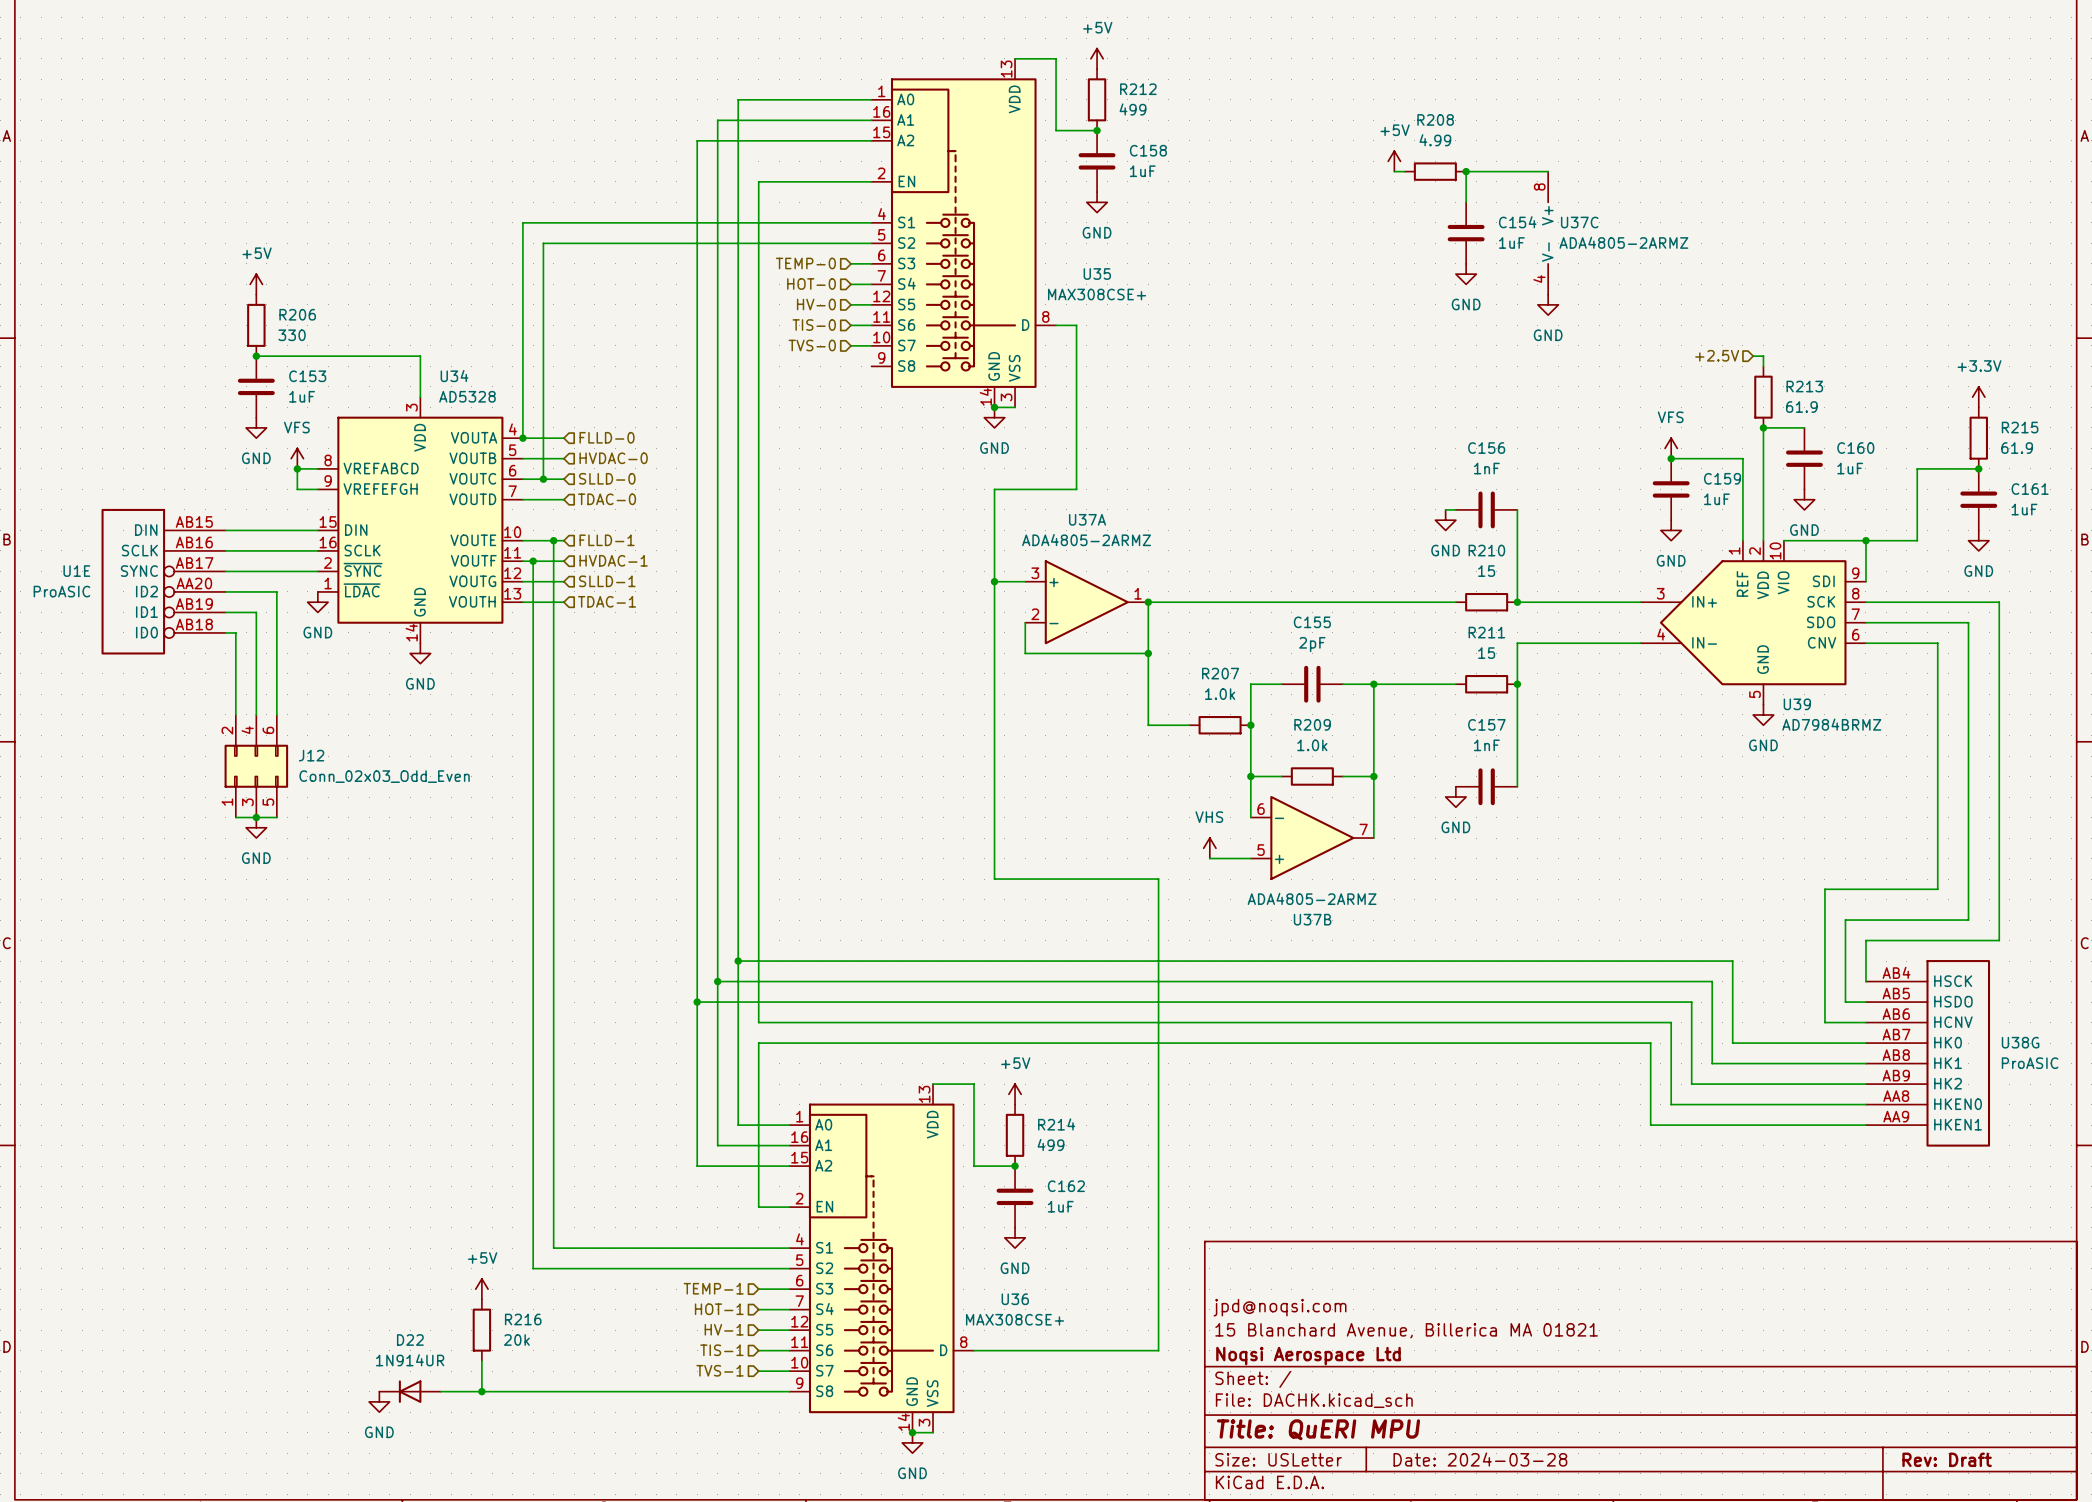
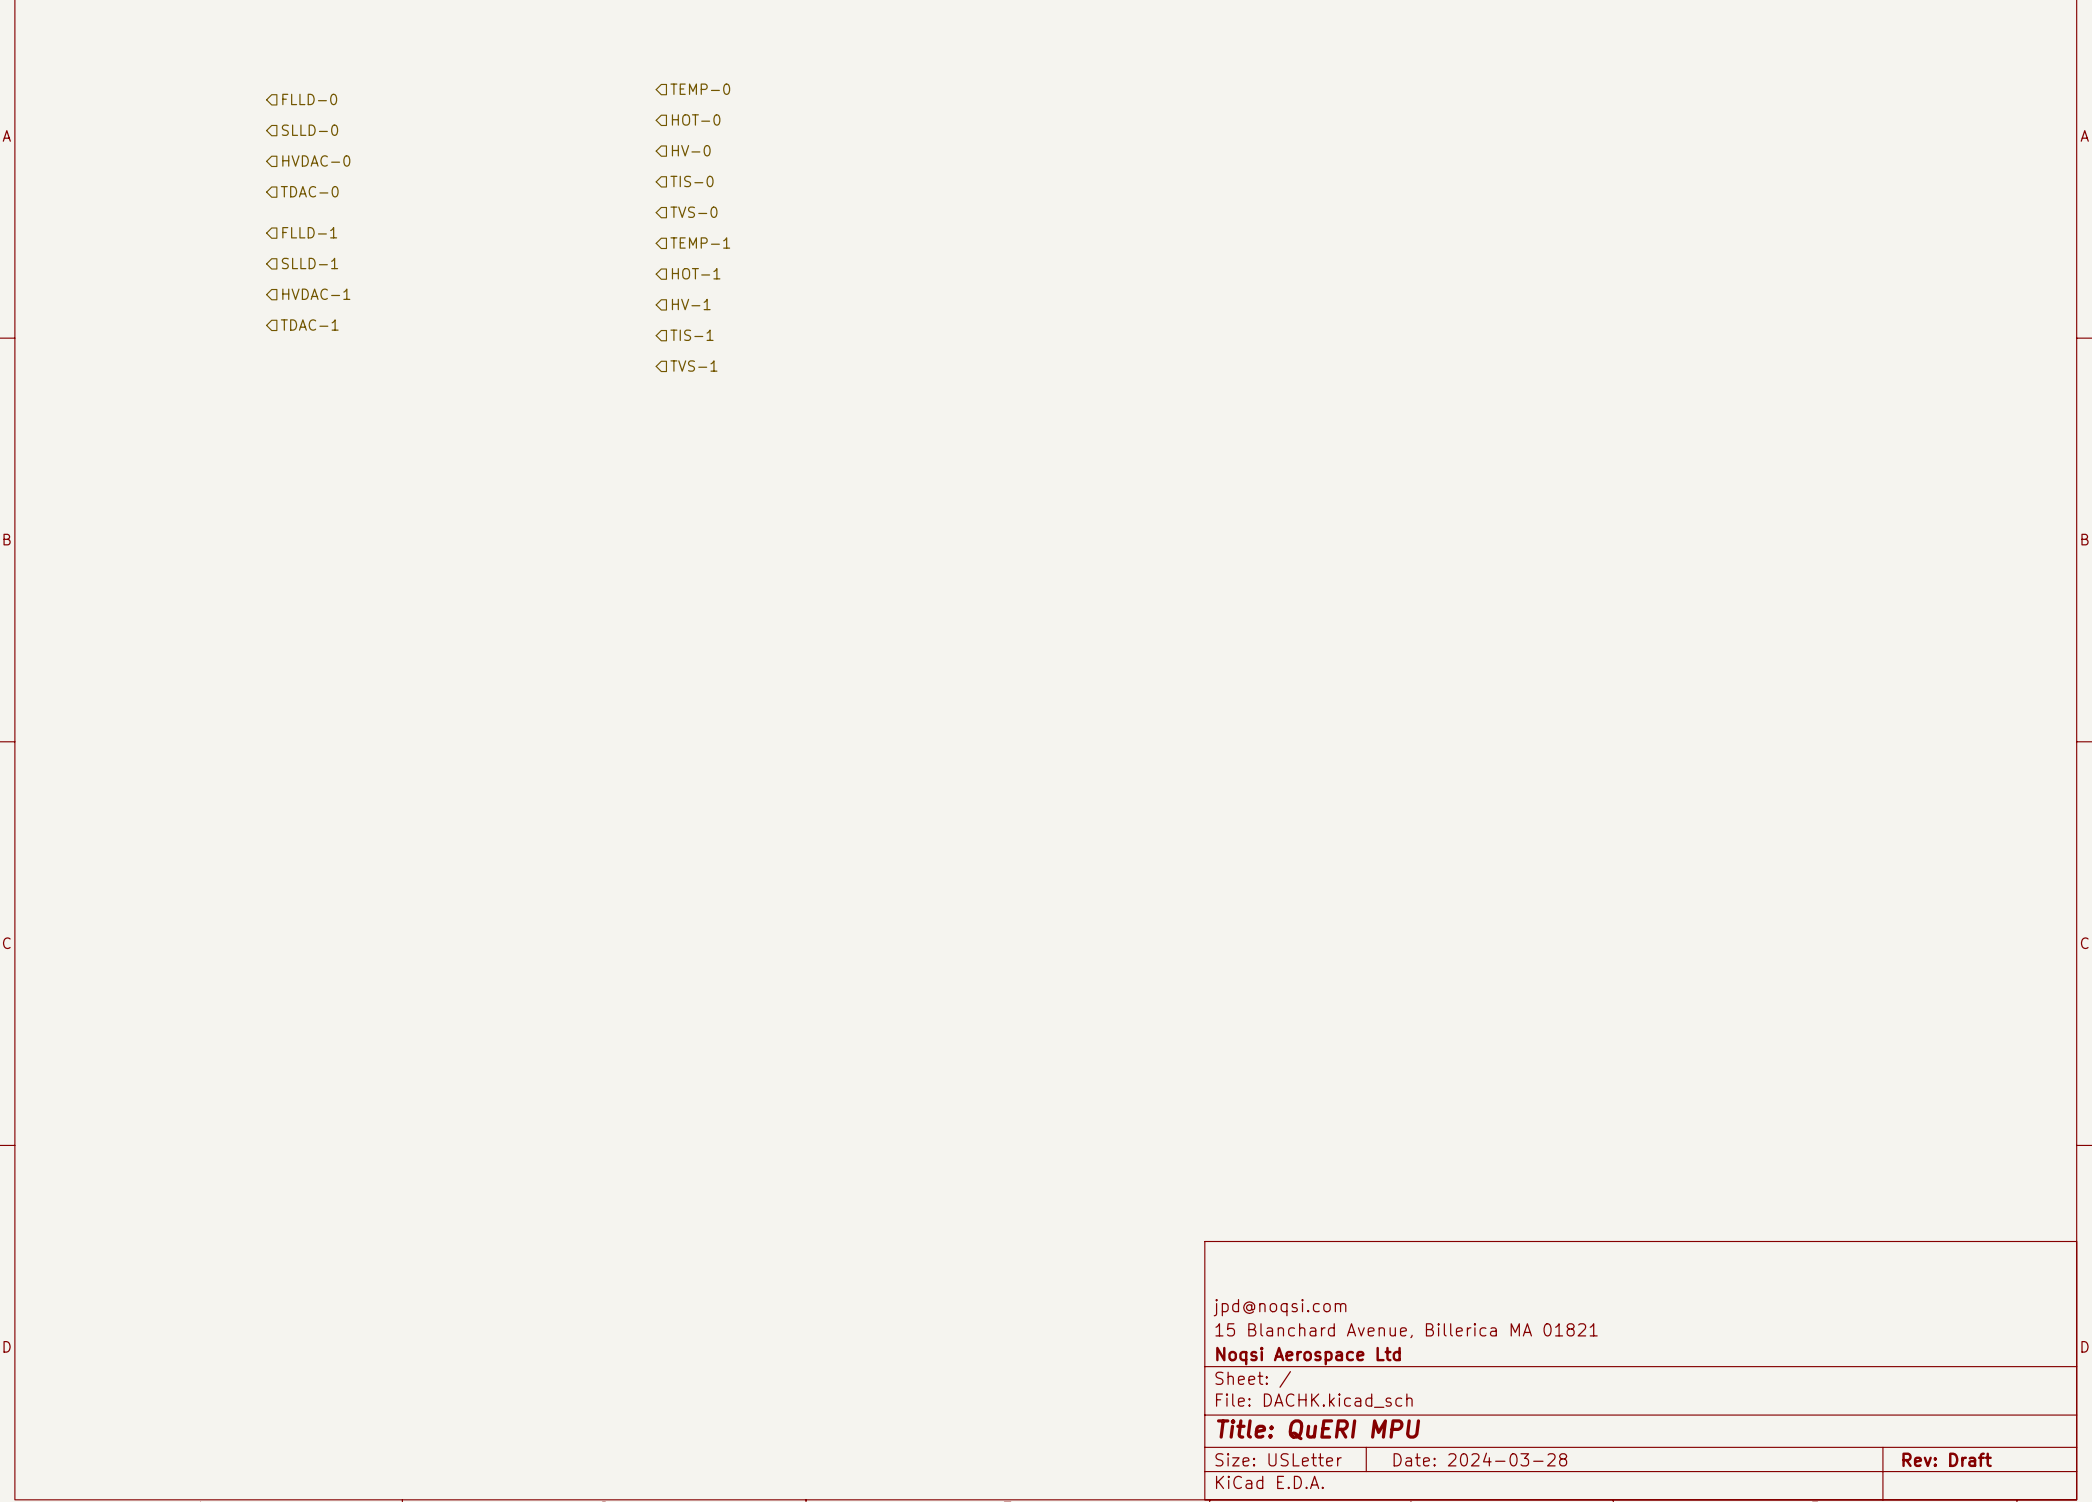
wire: (1015, 58) (1056, 58) (1056, 130) (1097, 130) -> none
power symbol: +5V (1097, 58) -> none
hierarchical label: none -> TEMP-0 (700, 89)
hierarchical label: none -> FLLD-0 (309, 99)
wire: (871, 99) (738, 99) (738, 1125) (789, 1125) -> none
R212: 499 (1097, 99) -> none
hierarchical label: none -> HOT-0 (696, 119)
wire: (871, 120) (717, 120) (717, 1145) (789, 1145) -> none
hierarchical label: none -> SLLD-0 (309, 130)
junction: (1097, 130) -> none
wire: (871, 140) (697, 140) (697, 1166) (789, 1166) -> none
hierarchical label: none -> HV-0 (691, 150)
hierarchical label: none -> HVDAC-0 (316, 160)
C158: 1uF (1097, 161) -> none
power symbol: +5V (1394, 161) -> none
wire: (1394, 171) (1404, 171) -> none
R208: 4.99 (1435, 171) -> none
junction: (1466, 171) -> none
wire: (1548, 171) (1466, 171) (1466, 202) -> none
hierarchical label: none -> TIS-0 (691, 181)
wire: (871, 181) (758, 181) (758, 1022) (1671, 1022) (1671, 1104) (1865, 1104) -> none
hierarchical label: none -> TDAC-0 (309, 191)
power symbol: GND (1097, 202) -> none
hierarchical label: none -> TVS-0 (693, 212)
wire: (871, 222) (522, 222) (522, 438) (563, 438) -> none
hierarchical label: none -> FLLD-1 (309, 232)
U35: MAX308CSE+ (963, 233) -> none
C154: 1uF (1466, 233) -> none
U37C: ADA4805-2ARMZ (1548, 233) -> none
hierarchical label: none -> TEMP-1 (700, 242)
wire: (871, 243) (543, 243) (543, 479) -> none
hierarchical label: none -> SLLD-1 (309, 263)
hierarchical label: TEMP-0 (805, 263) -> none
wire: (850, 263) (871, 263) -> none
hierarchical label: none -> HOT-1 (696, 273)
power symbol: GND (1466, 274) -> none
power symbol: +5V (256, 284) -> none
hierarchical label: HOT-0 (811, 284) -> none
wire: (850, 284) (871, 284) -> none
hierarchical label: none -> HVDAC-1 (316, 294)
hierarchical label: none -> HV-1 (691, 304)
hierarchical label: HV-0 (816, 304) -> none
wire: (850, 304) (871, 304) -> none
power symbol: GND (1548, 304) -> none
R206: 330 (256, 325) -> none
hierarchical label: none -> TDAC-1 (309, 325)
hierarchical label: TIS-0 (814, 325) -> none
wire: (850, 325) (871, 325) -> none
wire: (1056, 325) (1076, 325) (1076, 489) (994, 489) (994, 879) (1158, 879) (1158, 1350) (974, 1350) -> none
hierarchical label: none -> TIS-1 (691, 335)
hierarchical label: TVS-0 (812, 345) -> none
wire: (850, 345) (871, 345) -> none
hierarchical label: +2.5V (1717, 355) -> none
wire: (256, 356) (420, 356) (420, 397) -> none
junction: (256, 356) -> none
wire: (1753, 356) (1763, 356) (1763, 366) -> none
hierarchical label: none -> TVS-1 (693, 366)
C153: 1uF (256, 386) -> none
R213: 61.9 (1763, 397) -> none
power symbol: +3.3V (1978, 397) -> none
wire: (994, 407) (1015, 407) -> none
junction: (994, 407) -> none
power symbol: GND (994, 417) -> none
power symbol: GND (256, 427) -> none
junction: (1763, 427) -> none
wire: (1804, 427) (1763, 427) (1763, 540) -> none
hierarchical label: FLLD-0 (607, 437) -> none
junction: (522, 438) -> none
R215: 61.9 (1978, 438) -> none
power symbol: VFS (1671, 448) -> none
power symbol: VFS (297, 458) -> none
wire: (522, 458) (563, 458) -> none
hierarchical label: HVDAC-0 (613, 458) -> none
wire: (1671, 458) (1742, 458) (1742, 540) -> none
junction: (1671, 458) -> none
C160: 1uF (1804, 458) -> none
junction: (297, 468) -> none
wire: (317, 468) (297, 468) (297, 489) (317, 489) -> none
wire: (1978, 468) (1917, 468) (1917, 540) (1783, 540) -> none
junction: (1978, 468) -> none
hierarchical label: SLLD-0 (607, 478) -> none
wire: (522, 479) (563, 479) -> none
junction: (543, 479) -> none
C159: 1uF (1671, 489) -> none
wire: (522, 499) (563, 499) -> none
hierarchical label: TDAC-0 (607, 499) -> none
power symbol: GND (1804, 499) -> none
C161: 1uF (1978, 499) -> none
wire: (1445, 509) (1455, 509) -> none
C156: 1nF (1486, 509) -> none
wire: (1517, 509) (1517, 602) (1640, 602) -> none
U34: AD5328 (420, 520) -> none
power symbol: GND (1445, 520) -> none
wire: (225, 530) (317, 530) -> none
power symbol: GND (1671, 530) -> none
wire: (522, 540) (563, 540) -> none
wire: (553, 540) (553, 1248) (789, 1248) -> none
junction: (553, 540) -> none
hierarchical label: FLLD-1 (607, 540) -> none
wire: (1865, 540) (1865, 581) -> none
junction: (1865, 540) -> none
power symbol: GND (1978, 540) -> none
wire: (225, 550) (317, 550) -> none
hierarchical label: HVDAC-1 (613, 560) -> none
wire: (522, 561) (563, 561) -> none
wire: (533, 561) (533, 1268) (789, 1268) -> none
junction: (533, 561) -> none
wire: (225, 571) (317, 571) -> none
U1E: ProASIC (163, 581) -> none
wire: (522, 581) (563, 581) -> none
hierarchical label: SLLD-1 (607, 581) -> none
wire: (994, 581) (1025, 581) -> none
junction: (994, 581) -> none
wire: (225, 591) (276, 591) (276, 714) -> none
hierarchical label: TDAC-1 (607, 601) -> none
power symbol: GND (317, 602) -> none
wire: (522, 602) (563, 602) -> none
U37A: ADA4805-2ARMZ (1086, 602) -> none
junction: (1148, 602) -> none
wire: (1455, 602) (1148, 602) (1148, 725) (1189, 725) -> none
R210: 15 (1486, 602) -> none
junction: (1517, 602) -> none
wire: (1865, 602) (1999, 602) (1999, 940) (1865, 940) (1865, 981) -> none
wire: (225, 612) (256, 612) (256, 714) -> none
wire: (1025, 622) (1025, 653) (1148, 653) -> none
U39: AD7984BRMZ (1753, 622) -> none
wire: (1865, 622) (1968, 622) (1968, 920) (1845, 920) (1845, 1002) (1865, 1002) -> none
wire: (225, 632) (235, 632) (235, 714) -> none
wire: (1640, 643) (1517, 643) (1517, 786) -> none
wire: (1865, 643) (1937, 643) (1937, 889) (1824, 889) (1824, 1022) (1865, 1022) -> none
power symbol: GND (420, 653) -> none
junction: (1148, 653) -> none
wire: (1281, 684) (1250, 684) (1250, 817) -> none
C155: 2pF (1312, 684) -> none
wire: (1343, 684) (1455, 684) -> none
wire: (1373, 684) (1373, 838) -> none
junction: (1373, 684) -> none
R211: 15 (1486, 684) -> none
junction: (1517, 684) -> none
power symbol: GND (1763, 714) -> none
R207: 1.0k (1220, 725) -> none
junction: (1250, 725) -> none
J12: Conn_02x03_Odd_Even (256, 766) -> none
wire: (1250, 776) (1281, 776) -> none
junction: (1250, 776) -> none
R209: 1.0k (1312, 776) -> none
wire: (1343, 776) (1373, 776) -> none
junction: (1373, 776) -> none
C157: 1nF (1486, 786) -> none
power symbol: GND (1455, 797) -> none
wire: (235, 817) (276, 817) -> none
junction: (256, 817) -> none
power symbol: GND (256, 827) -> none
U37B: ADA4805-2ARMZ (1312, 838) -> none
power symbol: VHS (1209, 848) -> none
wire: (1209, 858) (1250, 858) -> none
wire: (738, 961) (1732, 961) (1732, 1043) (1865, 1043) -> none
junction: (738, 961) -> none
wire: (717, 981) (1712, 981) (1712, 1063) (1865, 1063) -> none
junction: (717, 981) -> none
wire: (697, 1002) (1691, 1002) (1691, 1084) (1865, 1084) -> none
junction: (697, 1002) -> none
U38G: ProASIC (1928, 1053) -> none
wire: (933, 1084) (974, 1084) (974, 1166) (1015, 1166) -> none
power symbol: +5V (1015, 1094) -> none
wire: (1865, 1125) (1650, 1125) (1650, 1043) (758, 1043) (758, 1207) (789, 1207) -> none
R214: 499 (1015, 1135) -> none
junction: (1015, 1166) -> none
C162: 1uF (1015, 1196) -> none
power symbol: GND (1015, 1237) -> none
U36: MAX308CSE+ (881, 1258) -> none
hierarchical label: TEMP-1 (713, 1288) -> none
power symbol: +5V (481, 1289) -> none
wire: (758, 1289) (789, 1289) -> none
hierarchical label: HOT-1 (719, 1309) -> none
wire: (758, 1309) (789, 1309) -> none
hierarchical label: HV-1 (724, 1329) -> none
R216: 20k (481, 1330) -> none
wire: (758, 1330) (789, 1330) -> none
hierarchical label: TIS-1 (721, 1350) -> none
wire: (758, 1350) (789, 1350) -> none
wire: (481, 1360) (481, 1391) -> none
hierarchical label: TVS-1 (719, 1370) -> none
wire: (758, 1371) (789, 1371) -> none
D22: 1N914UR (410, 1391) -> none
wire: (440, 1391) (789, 1391) -> none
junction: (481, 1391) -> none
power symbol: GND (379, 1401) -> none
wire: (912, 1432) (933, 1432) -> none
junction: (912, 1432) -> none
power symbol: GND (912, 1442) -> none

